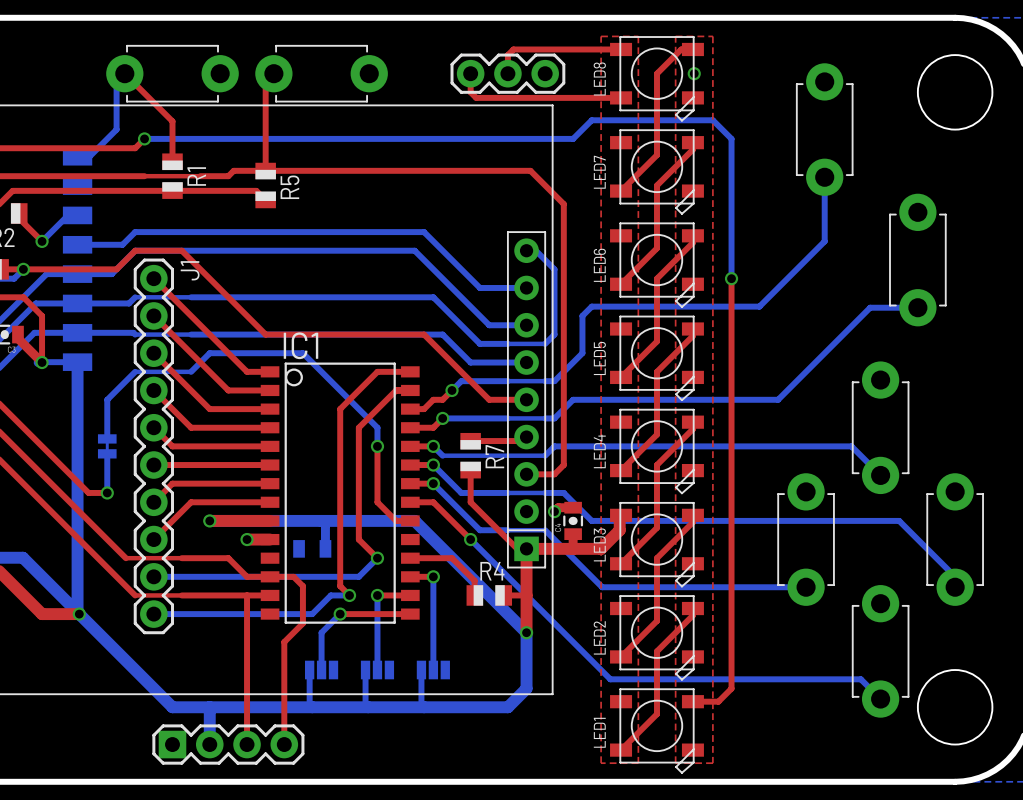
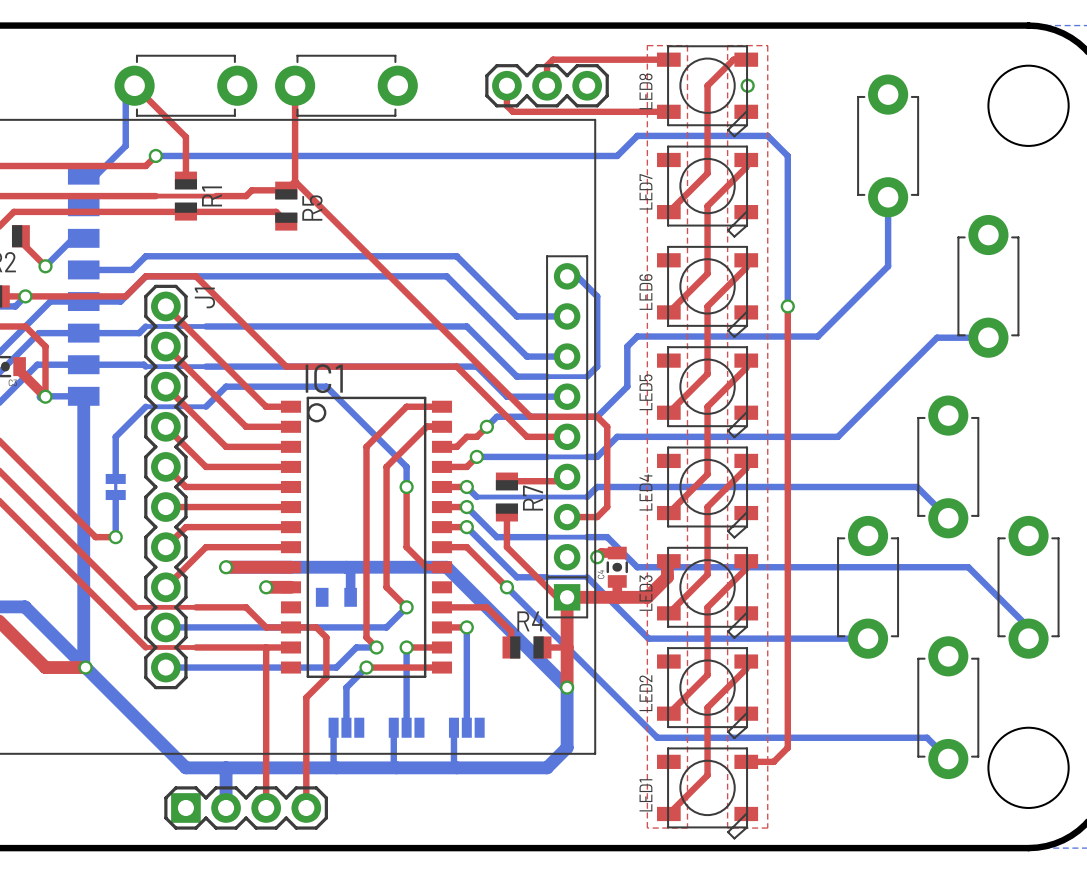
top track: (273, 73) (265, 81) (265, 170) (530, 170) (563, 204) (563, 390) -> (295, 181) (530, 416) (597, 416) (607, 426)
top track: none -> (295, 85) (295, 181)

